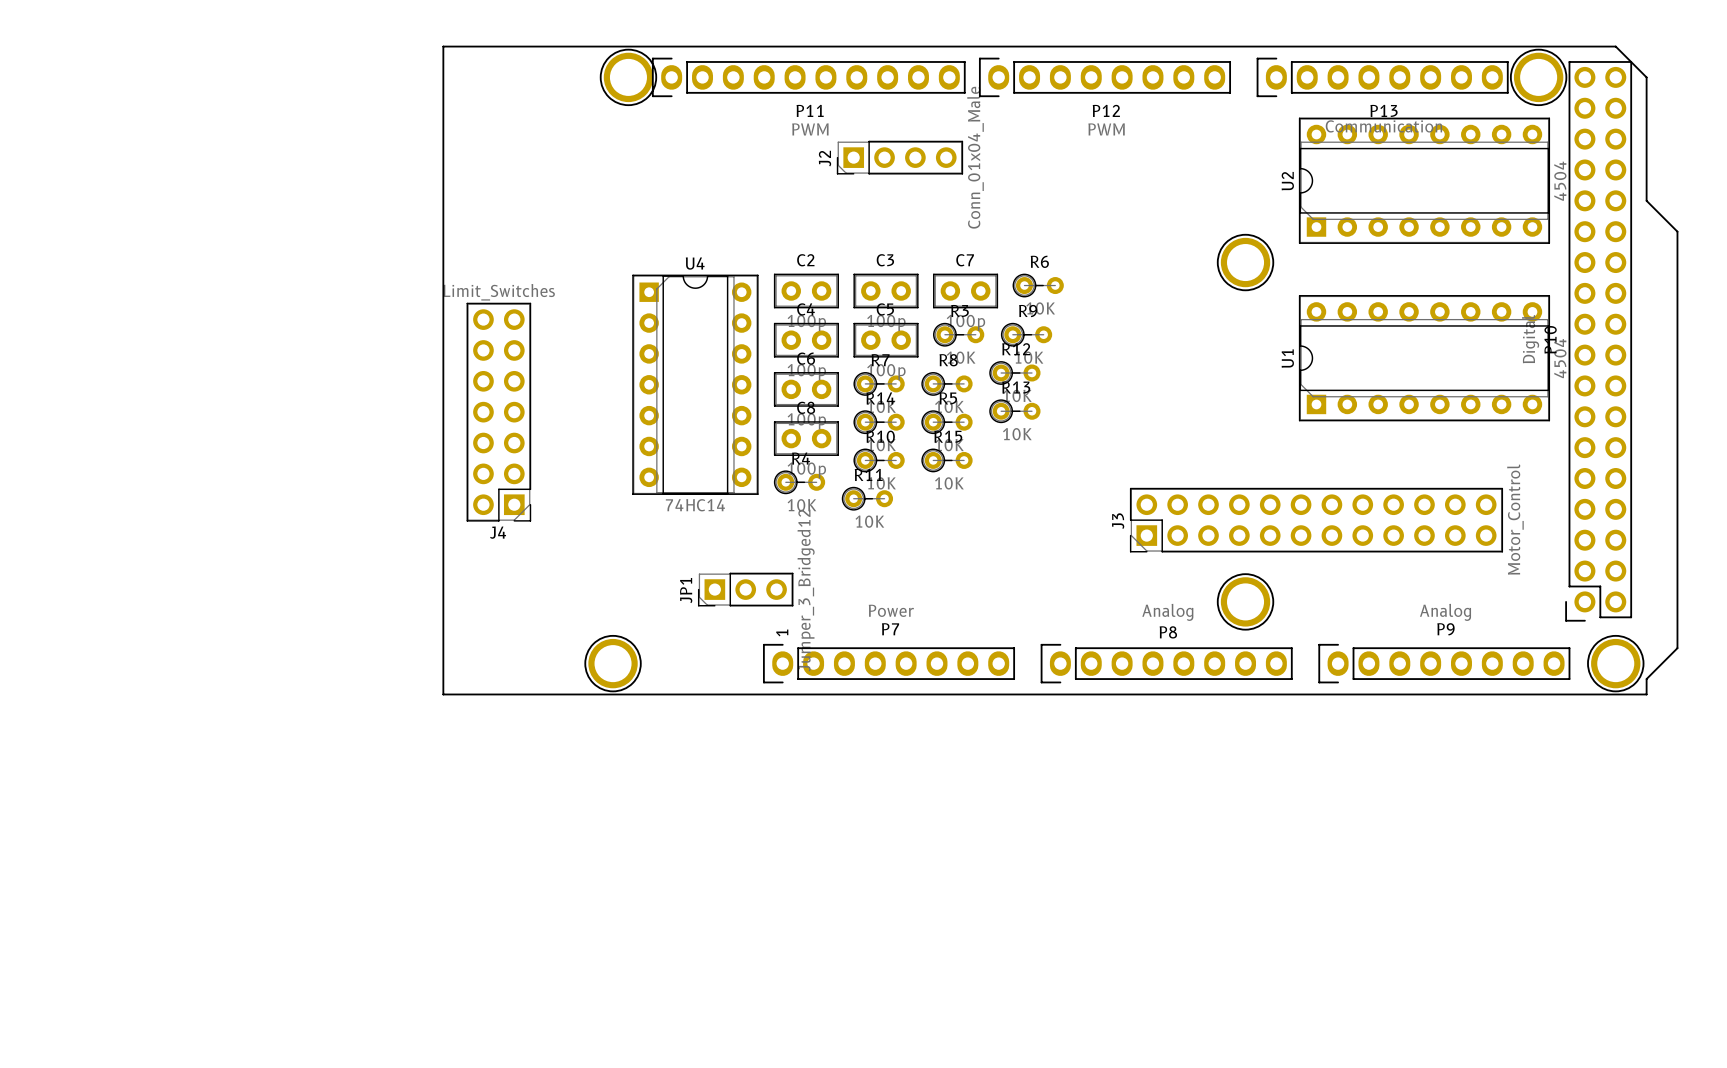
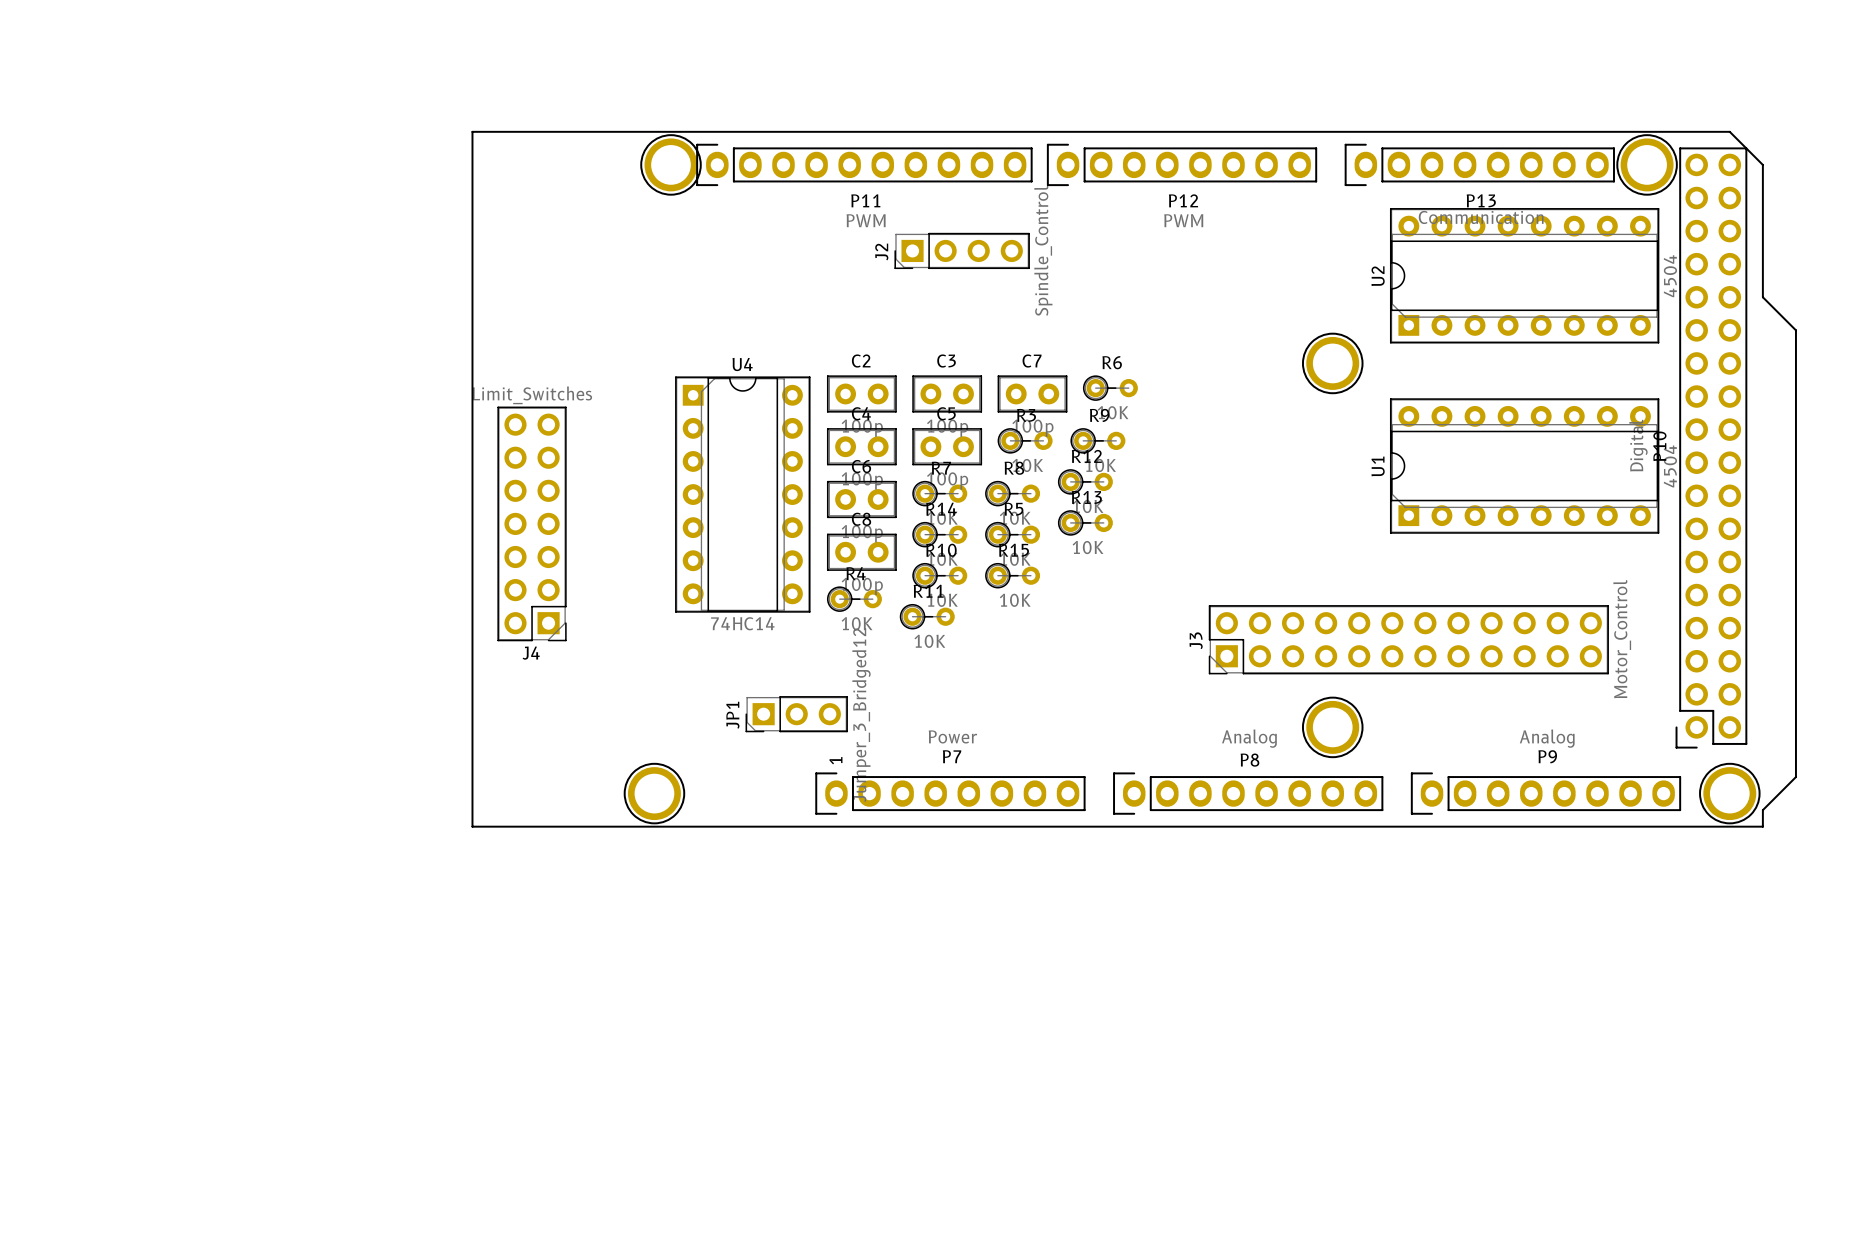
J2 value: Conn_01x04_Male (975, 157) -> Spindle_Control (1043, 250)

